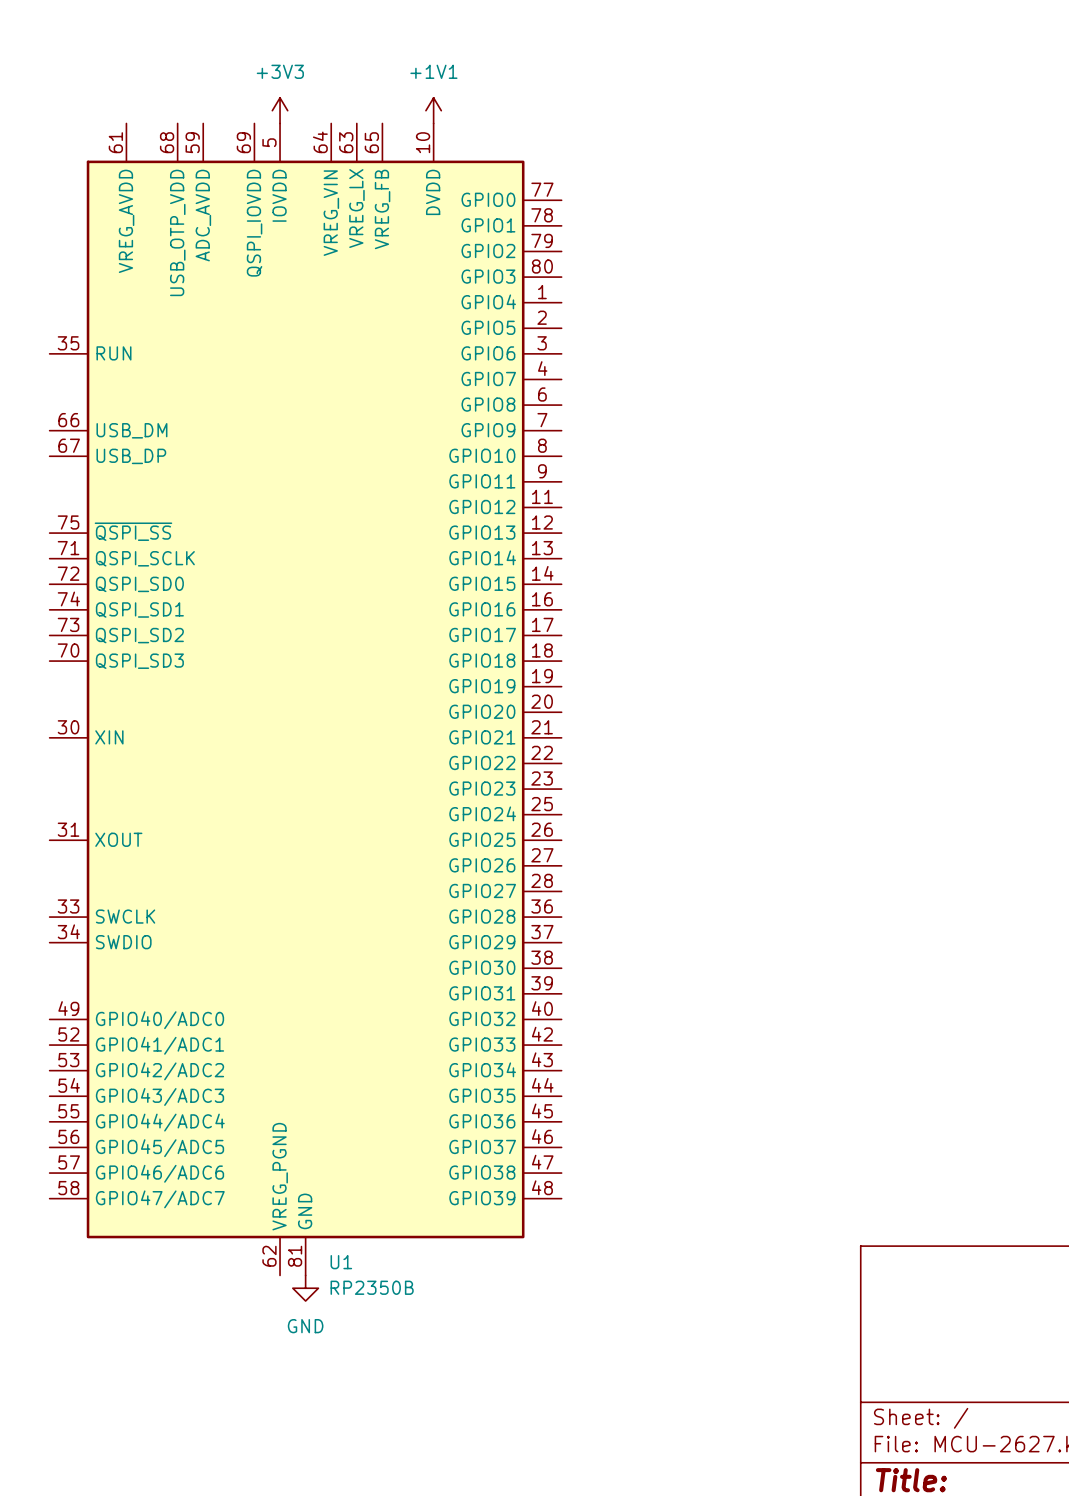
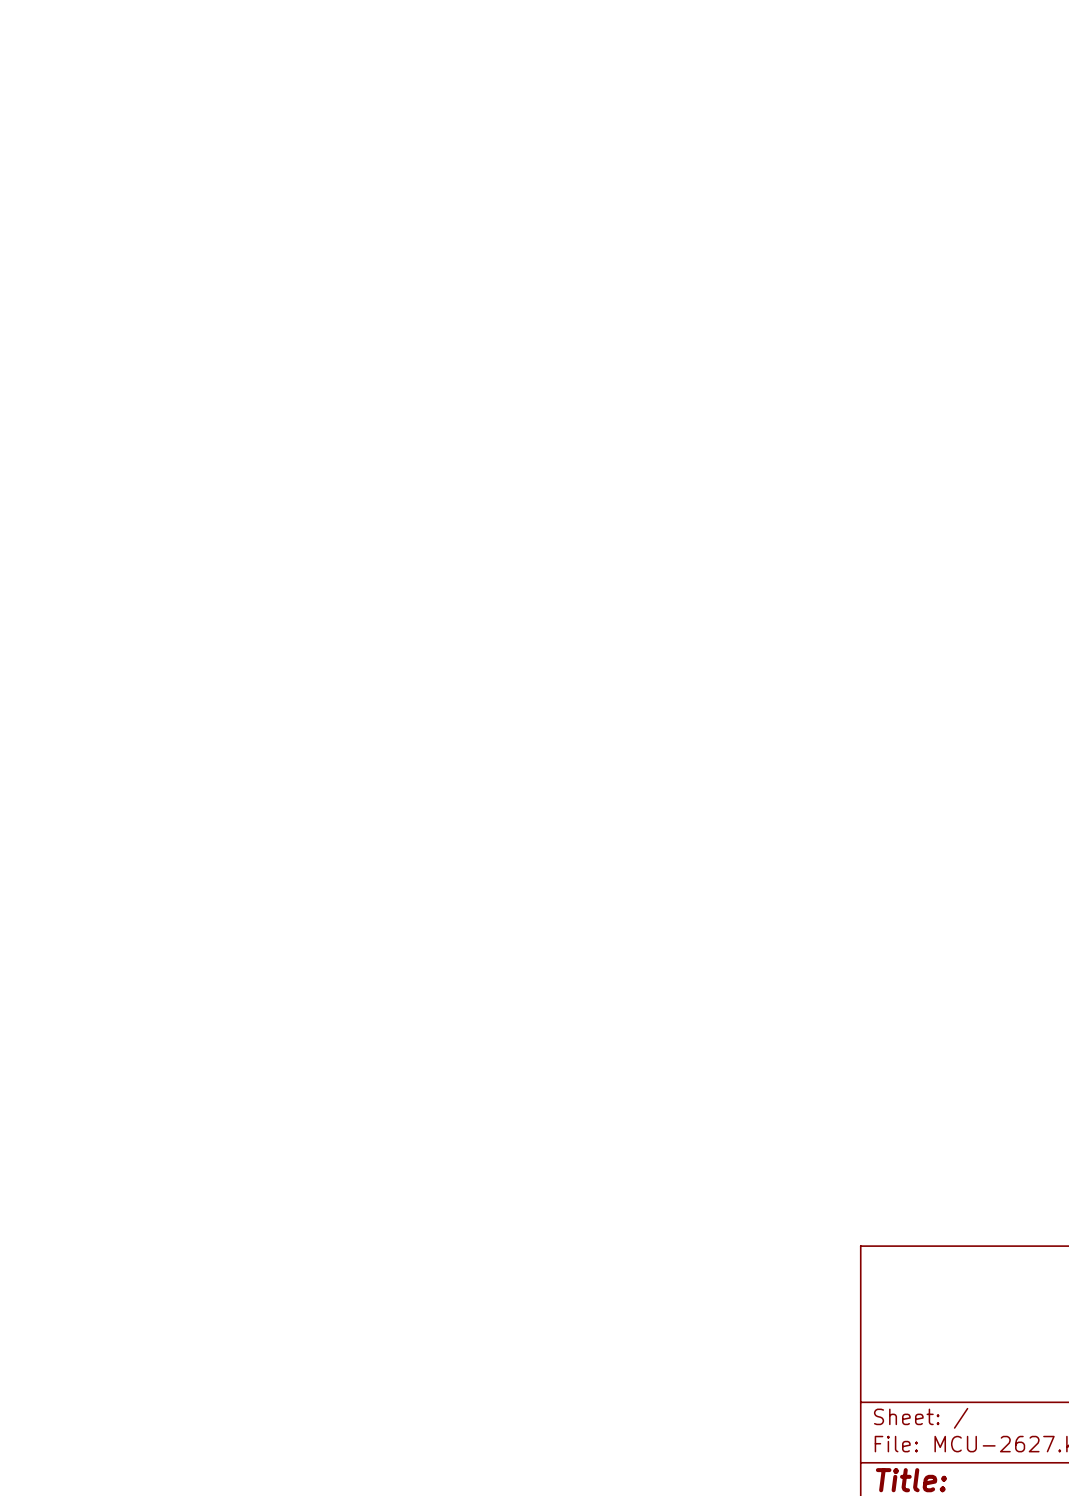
power symbol: +3V3 (280, 110) -> none
power symbol: +1V1 (433, 110) -> none
U1: RP2350B (305, 699) -> none
power symbol: GND (305, 1288) -> none

